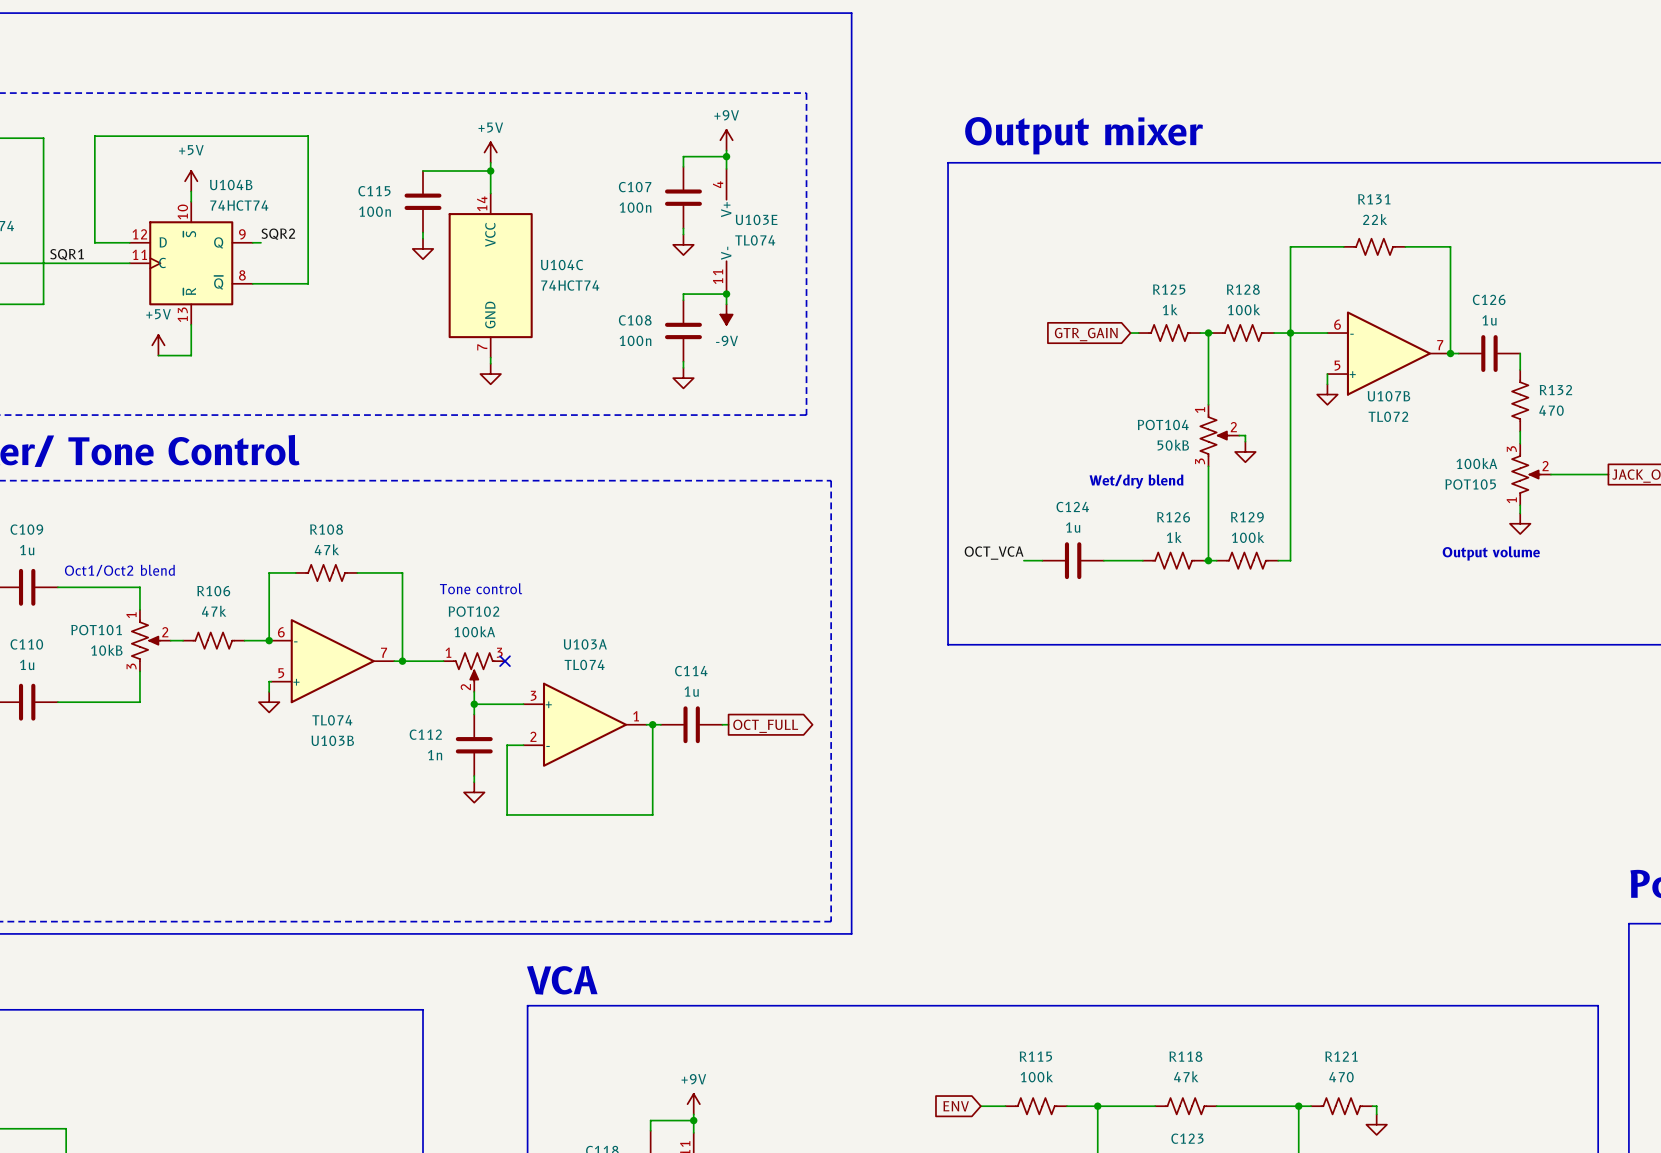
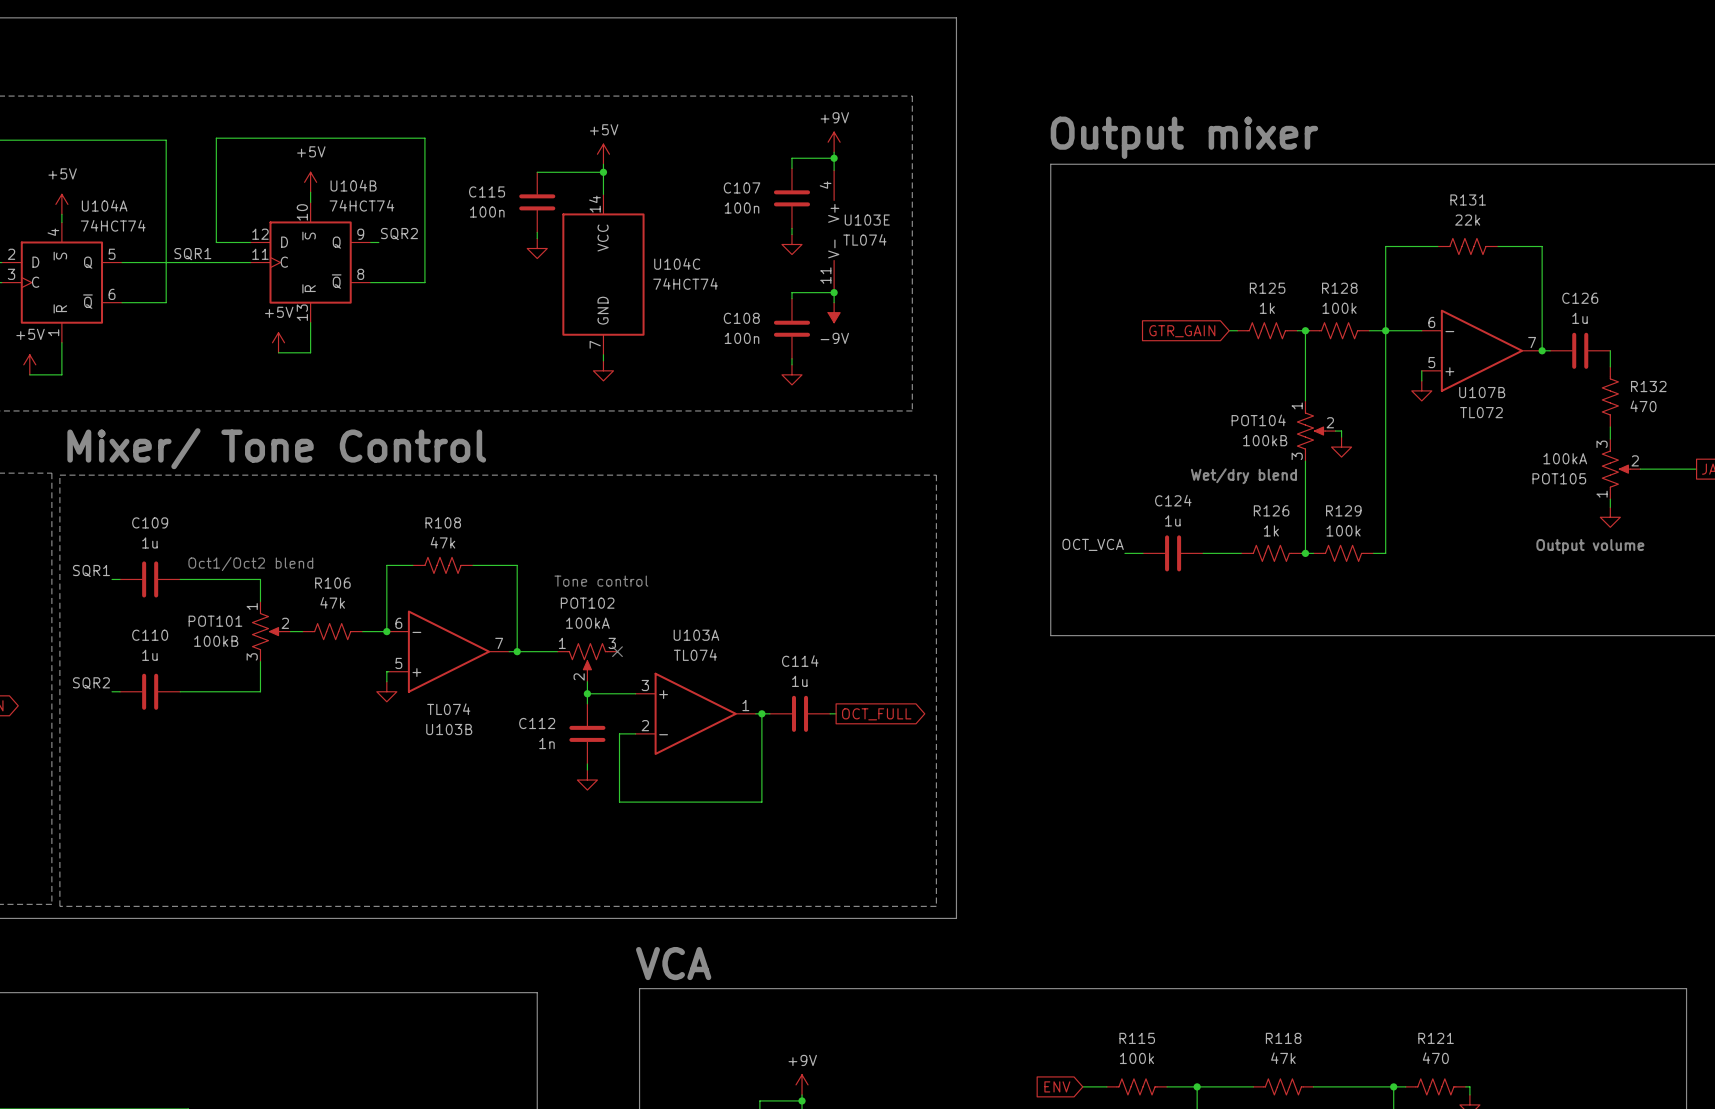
POT104 value: 50kB (1173, 445) -> 100kB (1265, 440)
POT101 value: 10kB (106, 650) -> 100kB (216, 641)

